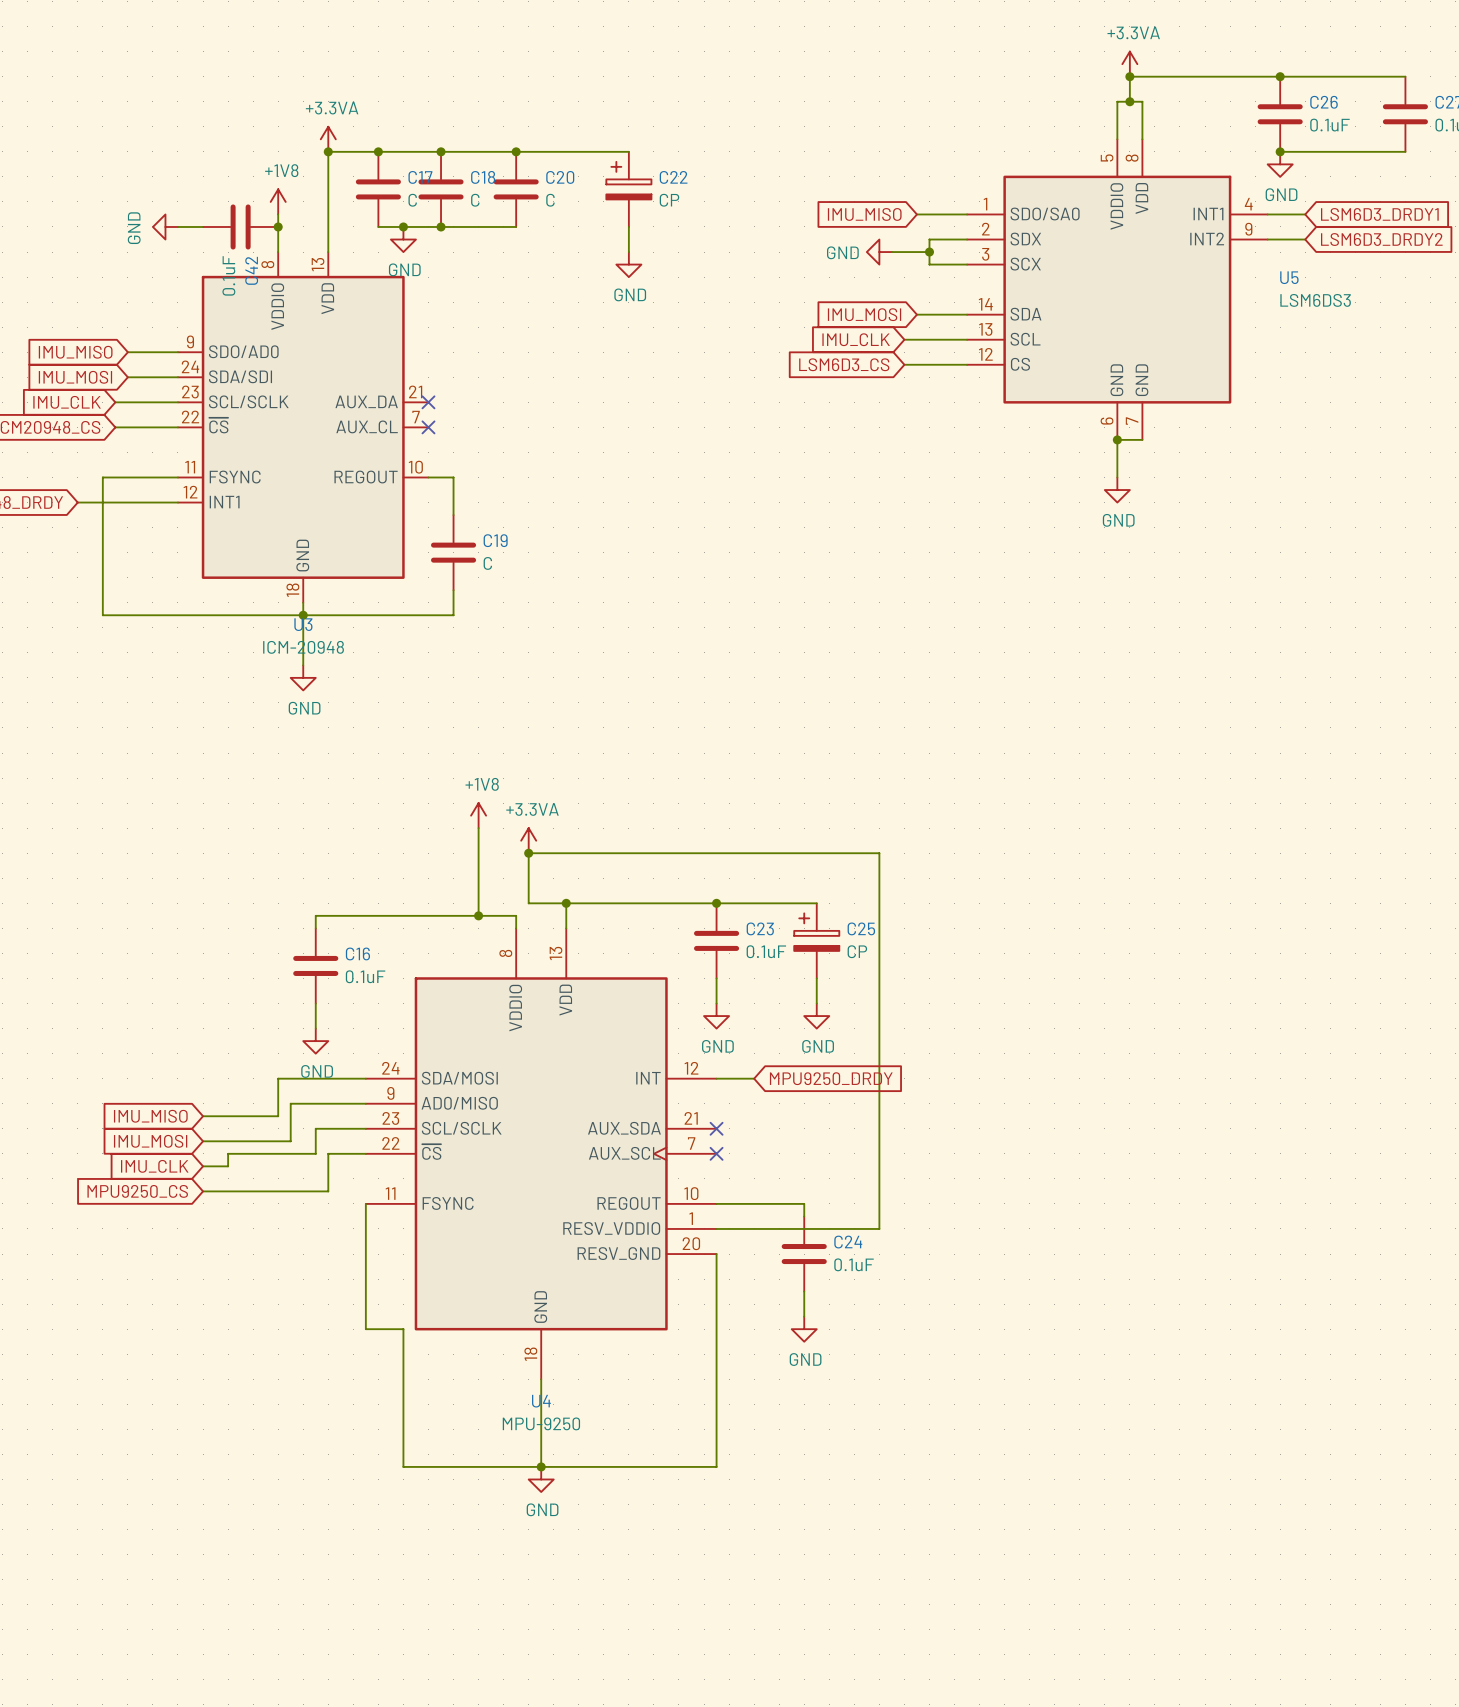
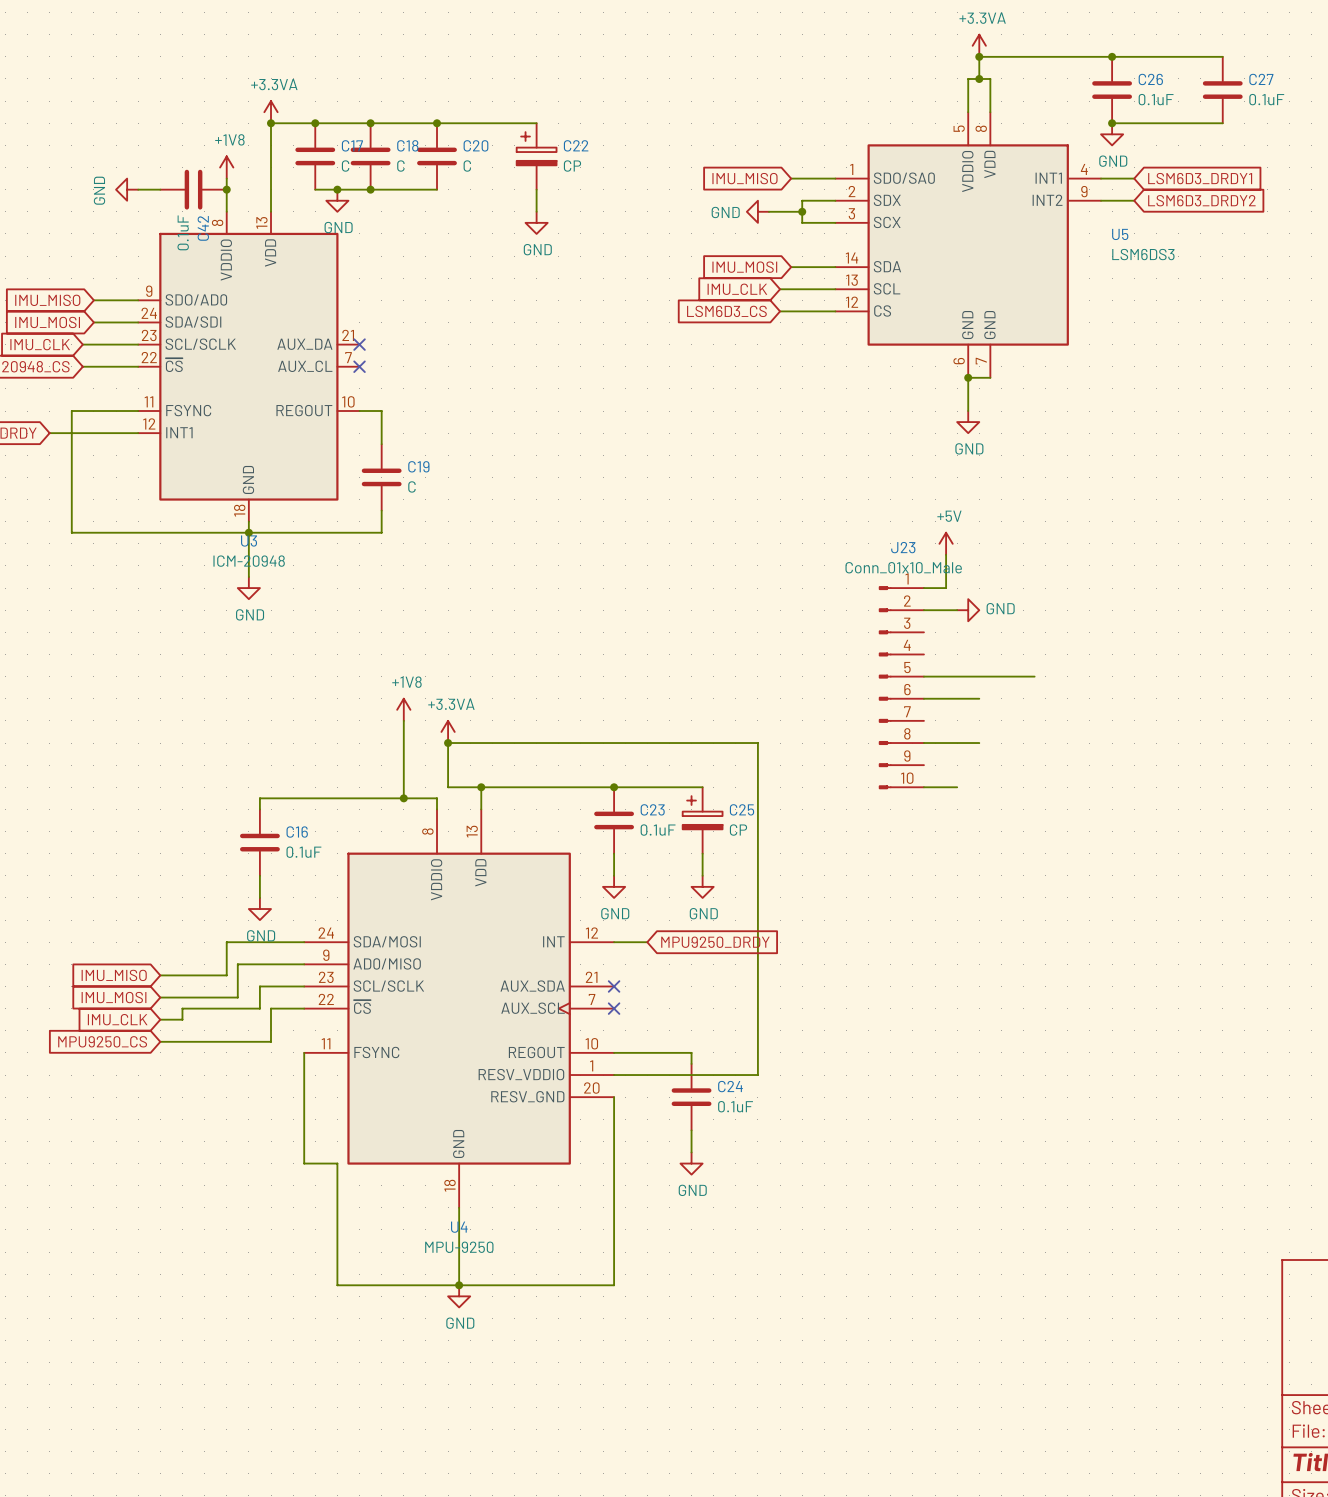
power symbol: none -> +5V (946, 543)
wire: none -> (946, 554) (946, 588) (923, 588)
wire: none -> (923, 610) (957, 610)
power symbol: none -> GND (968, 610)
wire: none -> (923, 676) (1034, 676)
J23: none -> Conn_01x10_Male (901, 687)
wire: none -> (923, 698) (979, 698)
wire: none -> (923, 743) (979, 743)
wire: none -> (923, 787) (957, 787)

